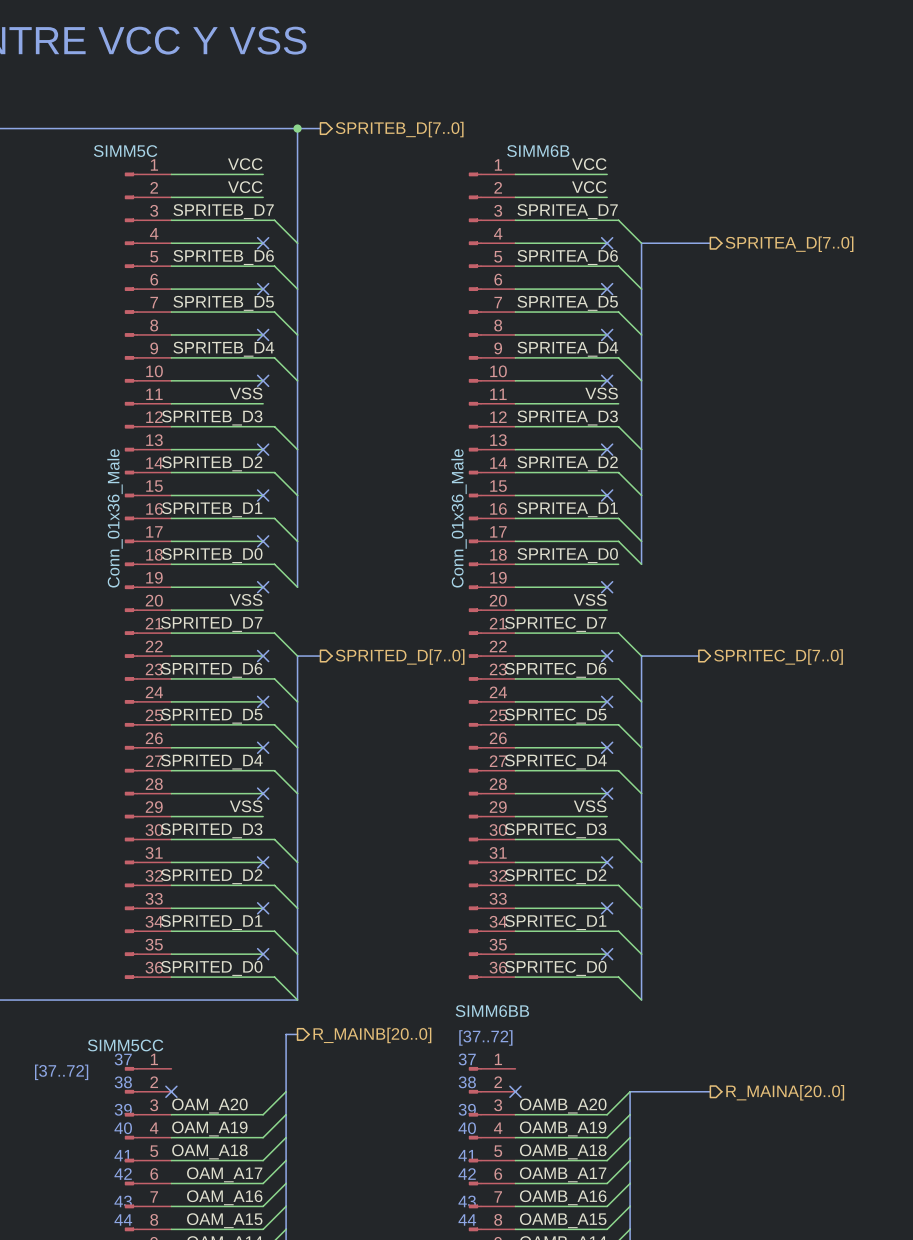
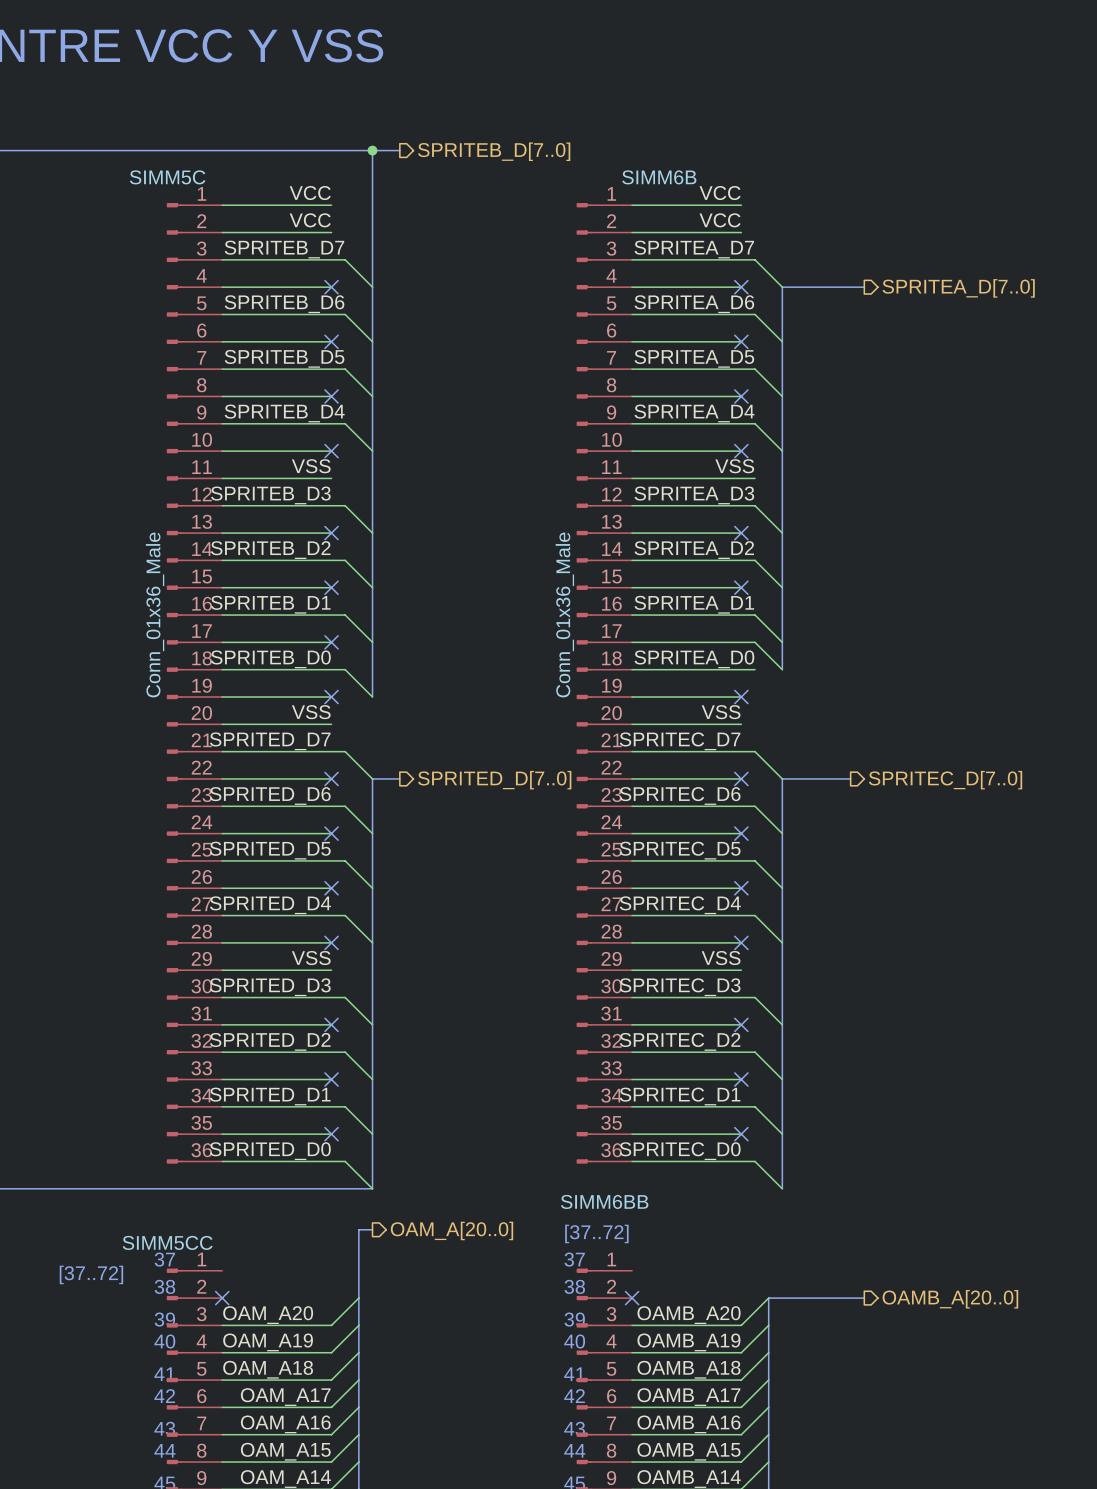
hierarchical label: R_MAINB[20..0] (372, 1035) -> OAM_A[20..0] (451, 1230)
hierarchical label: R_MAINA[20..0] (785, 1092) -> OAMB_A[20..0] (950, 1299)

